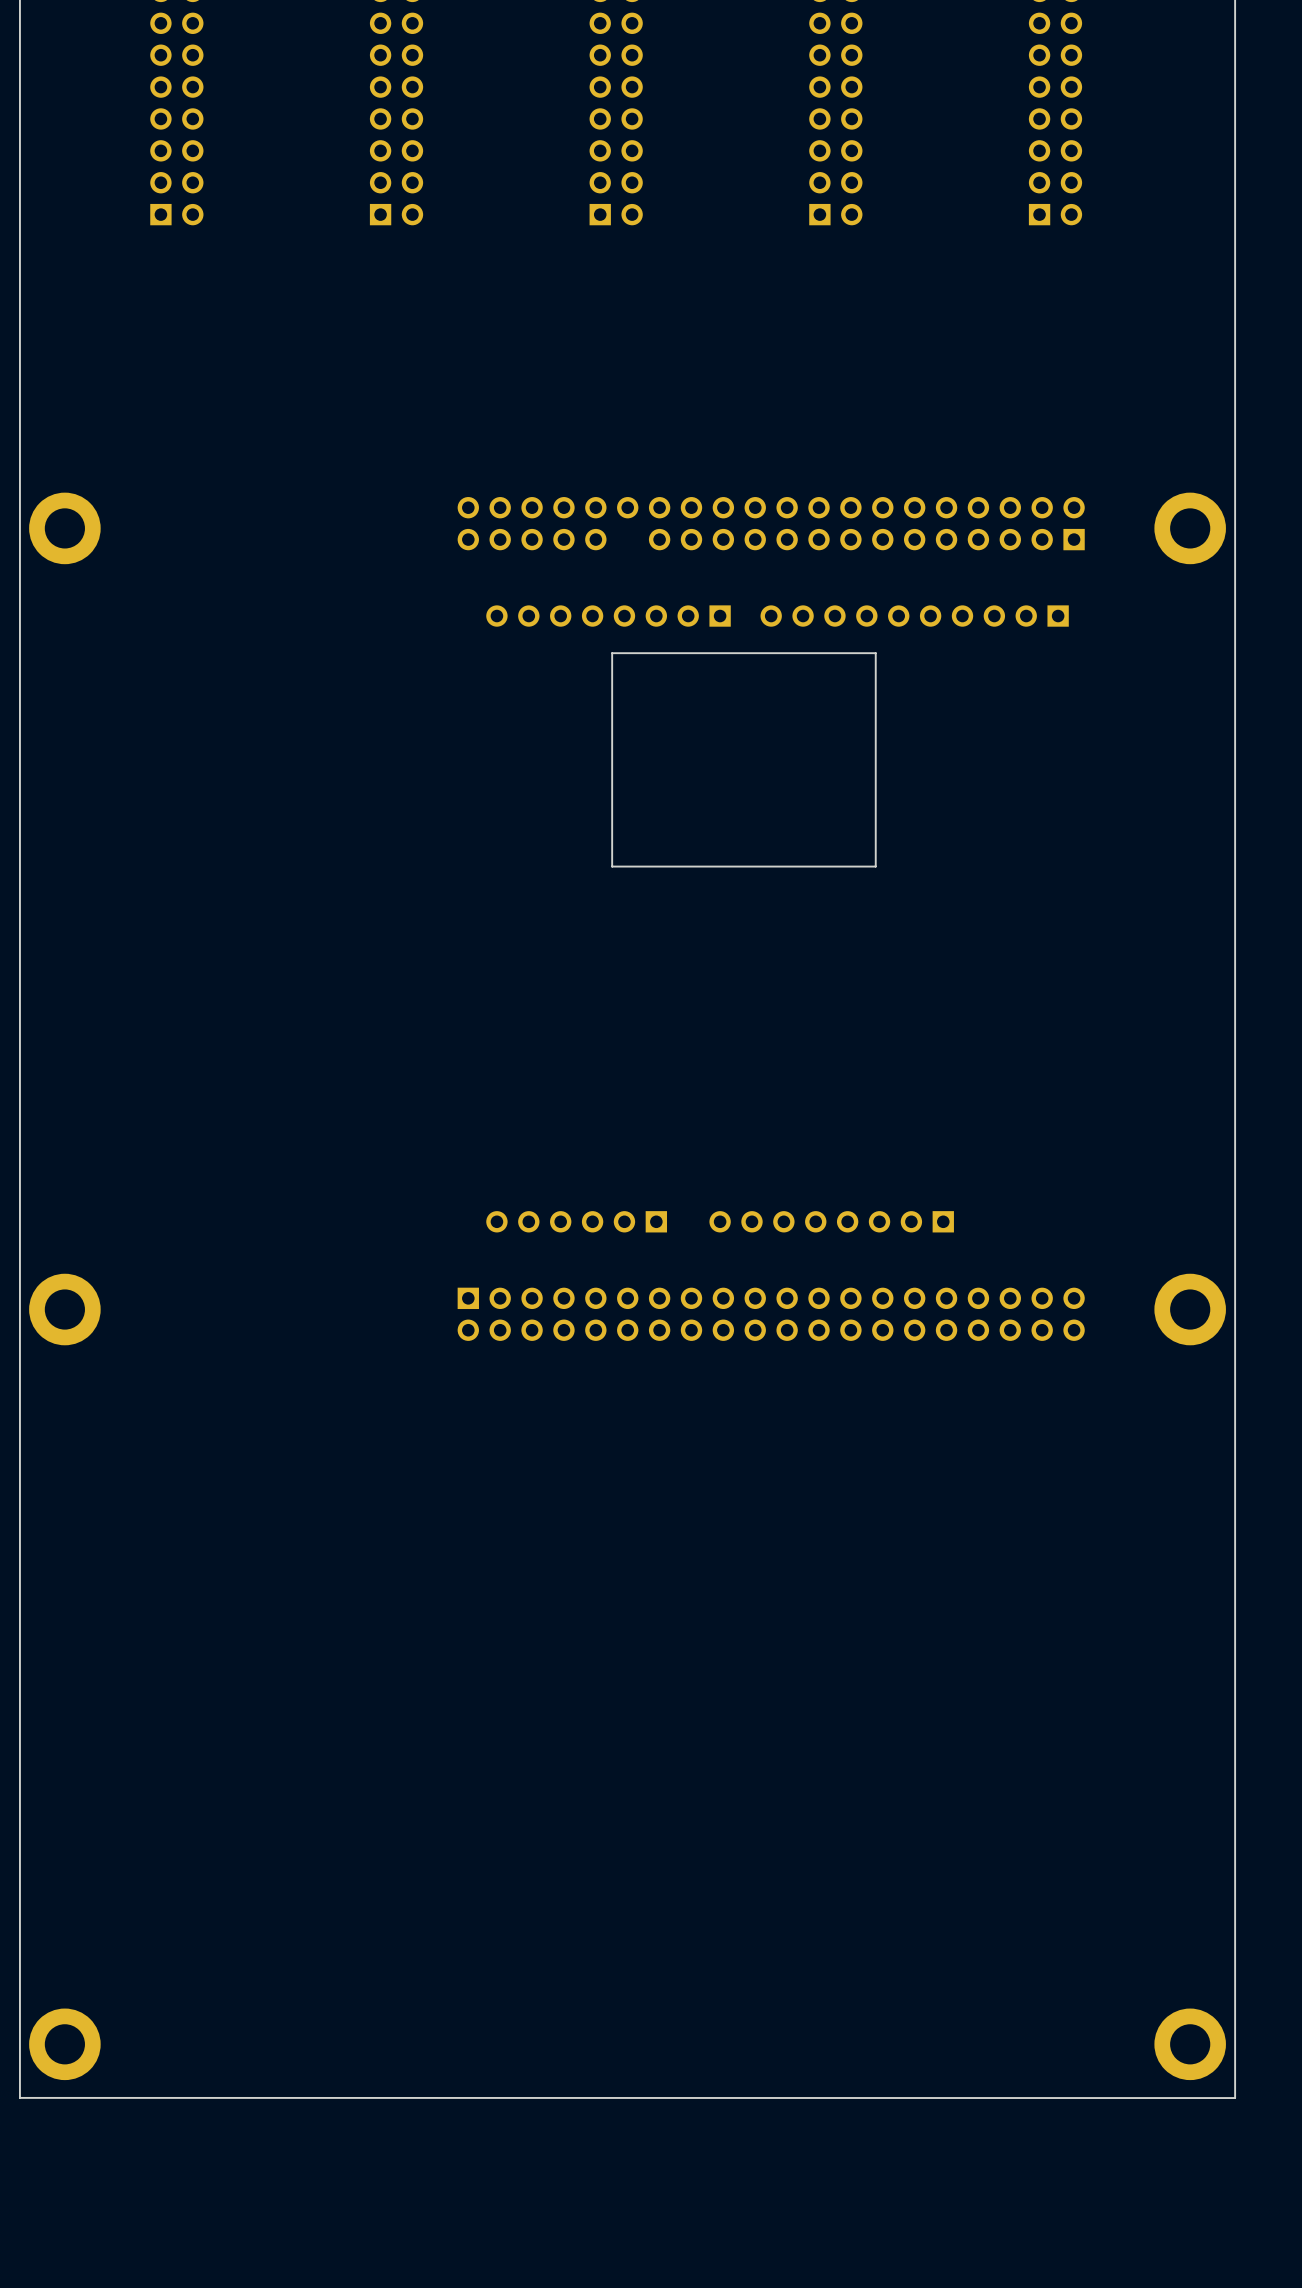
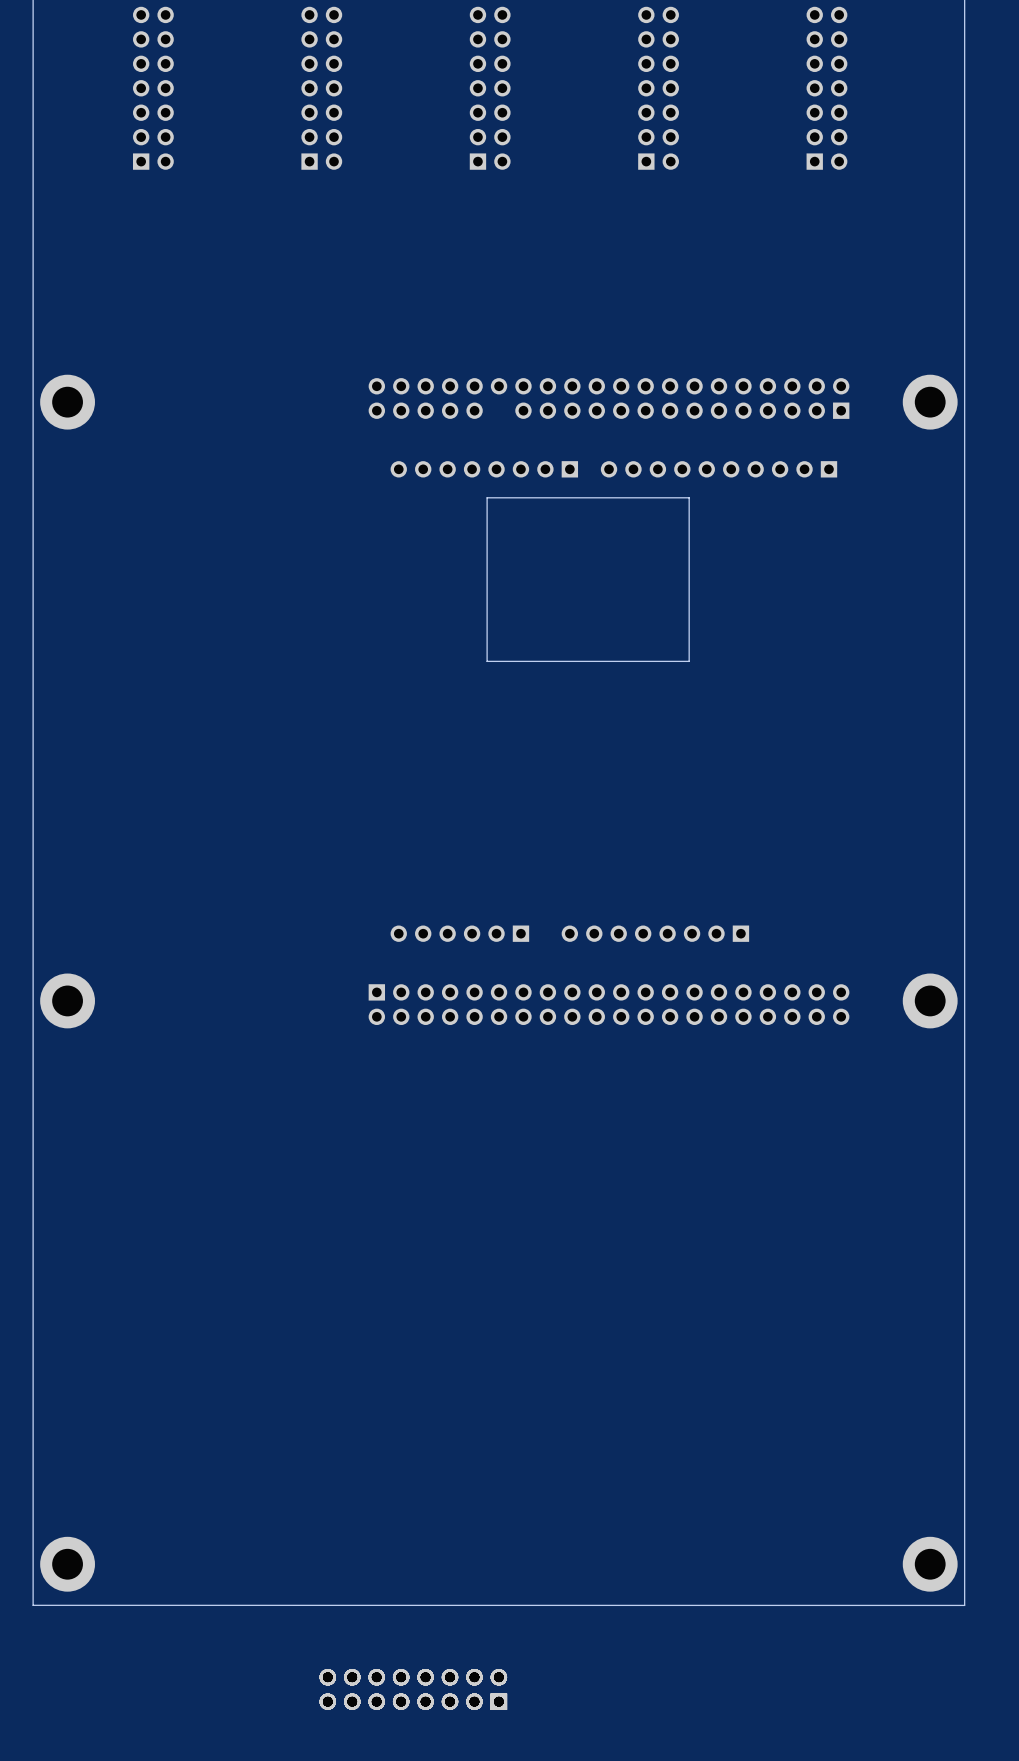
part: none -> (413, 1689)

